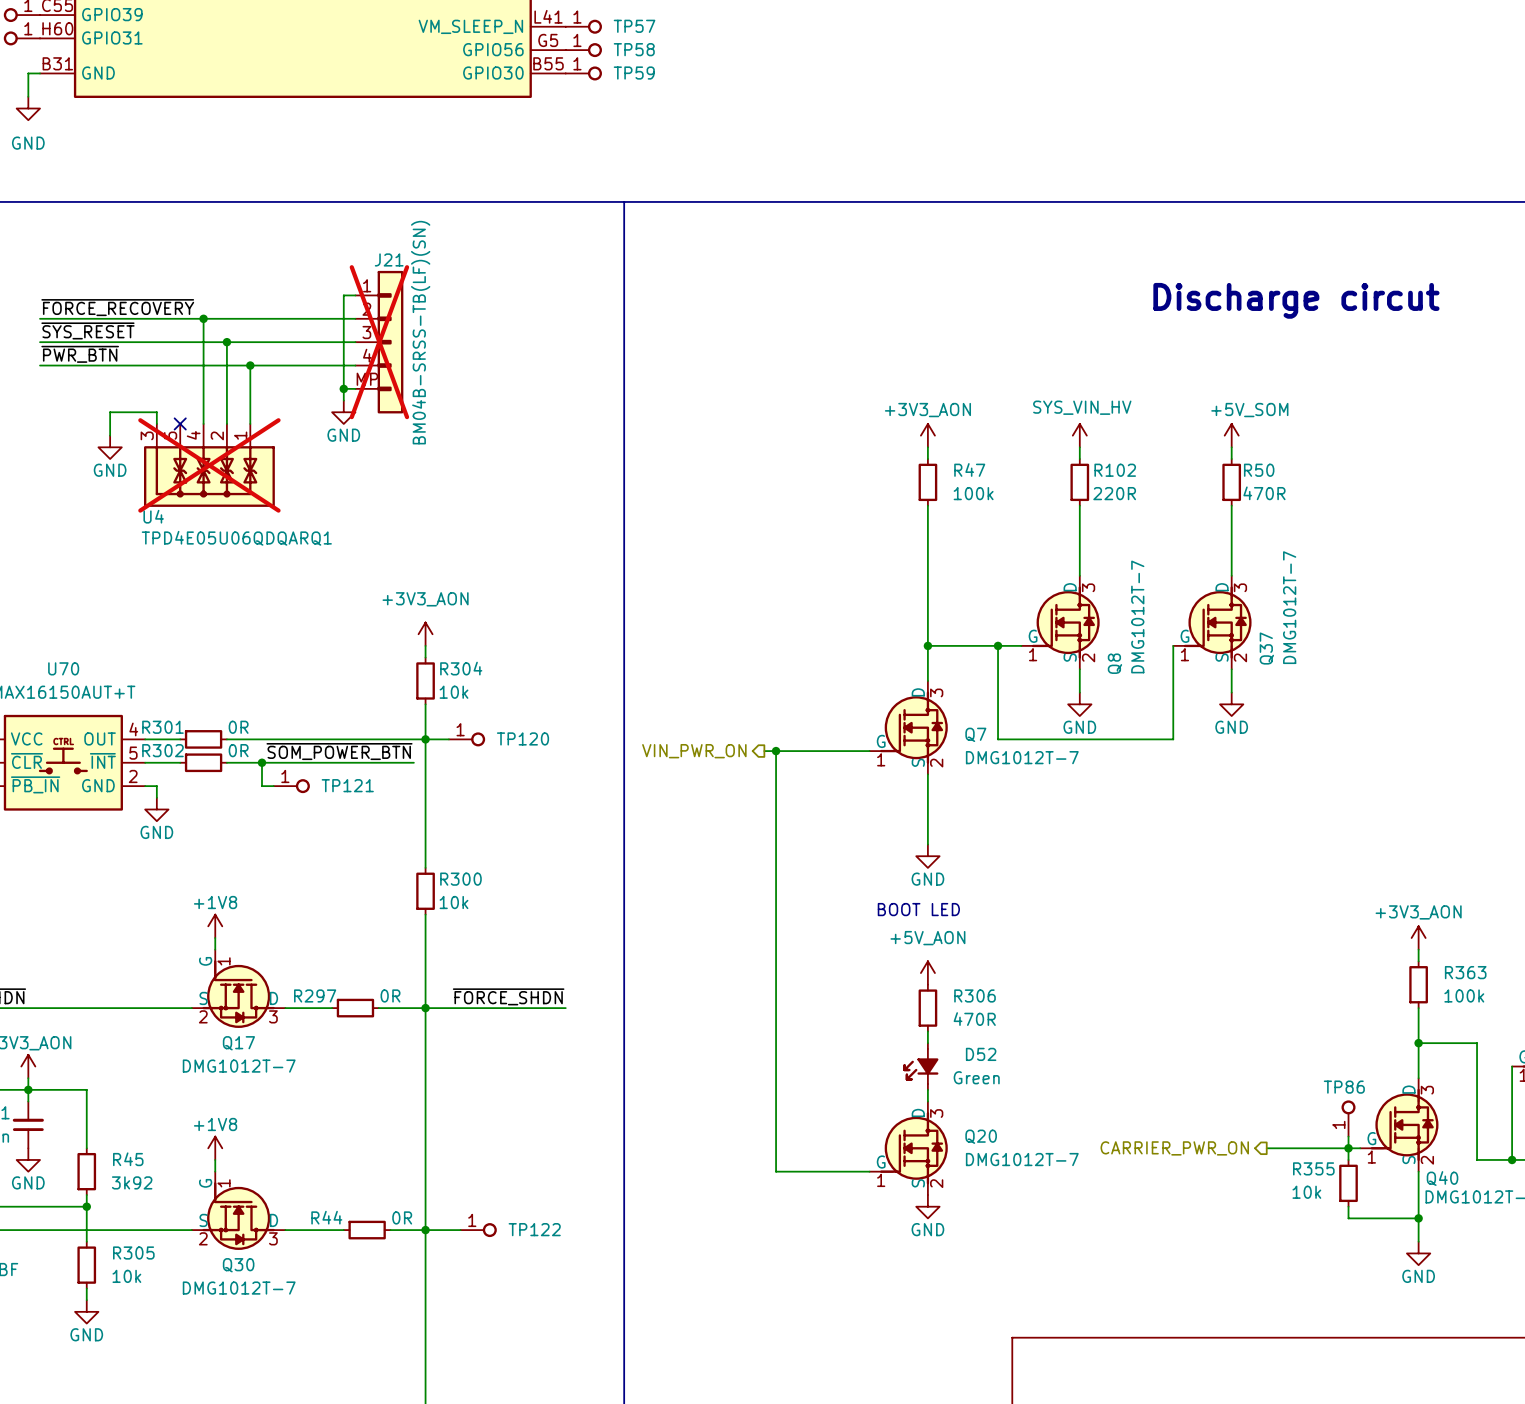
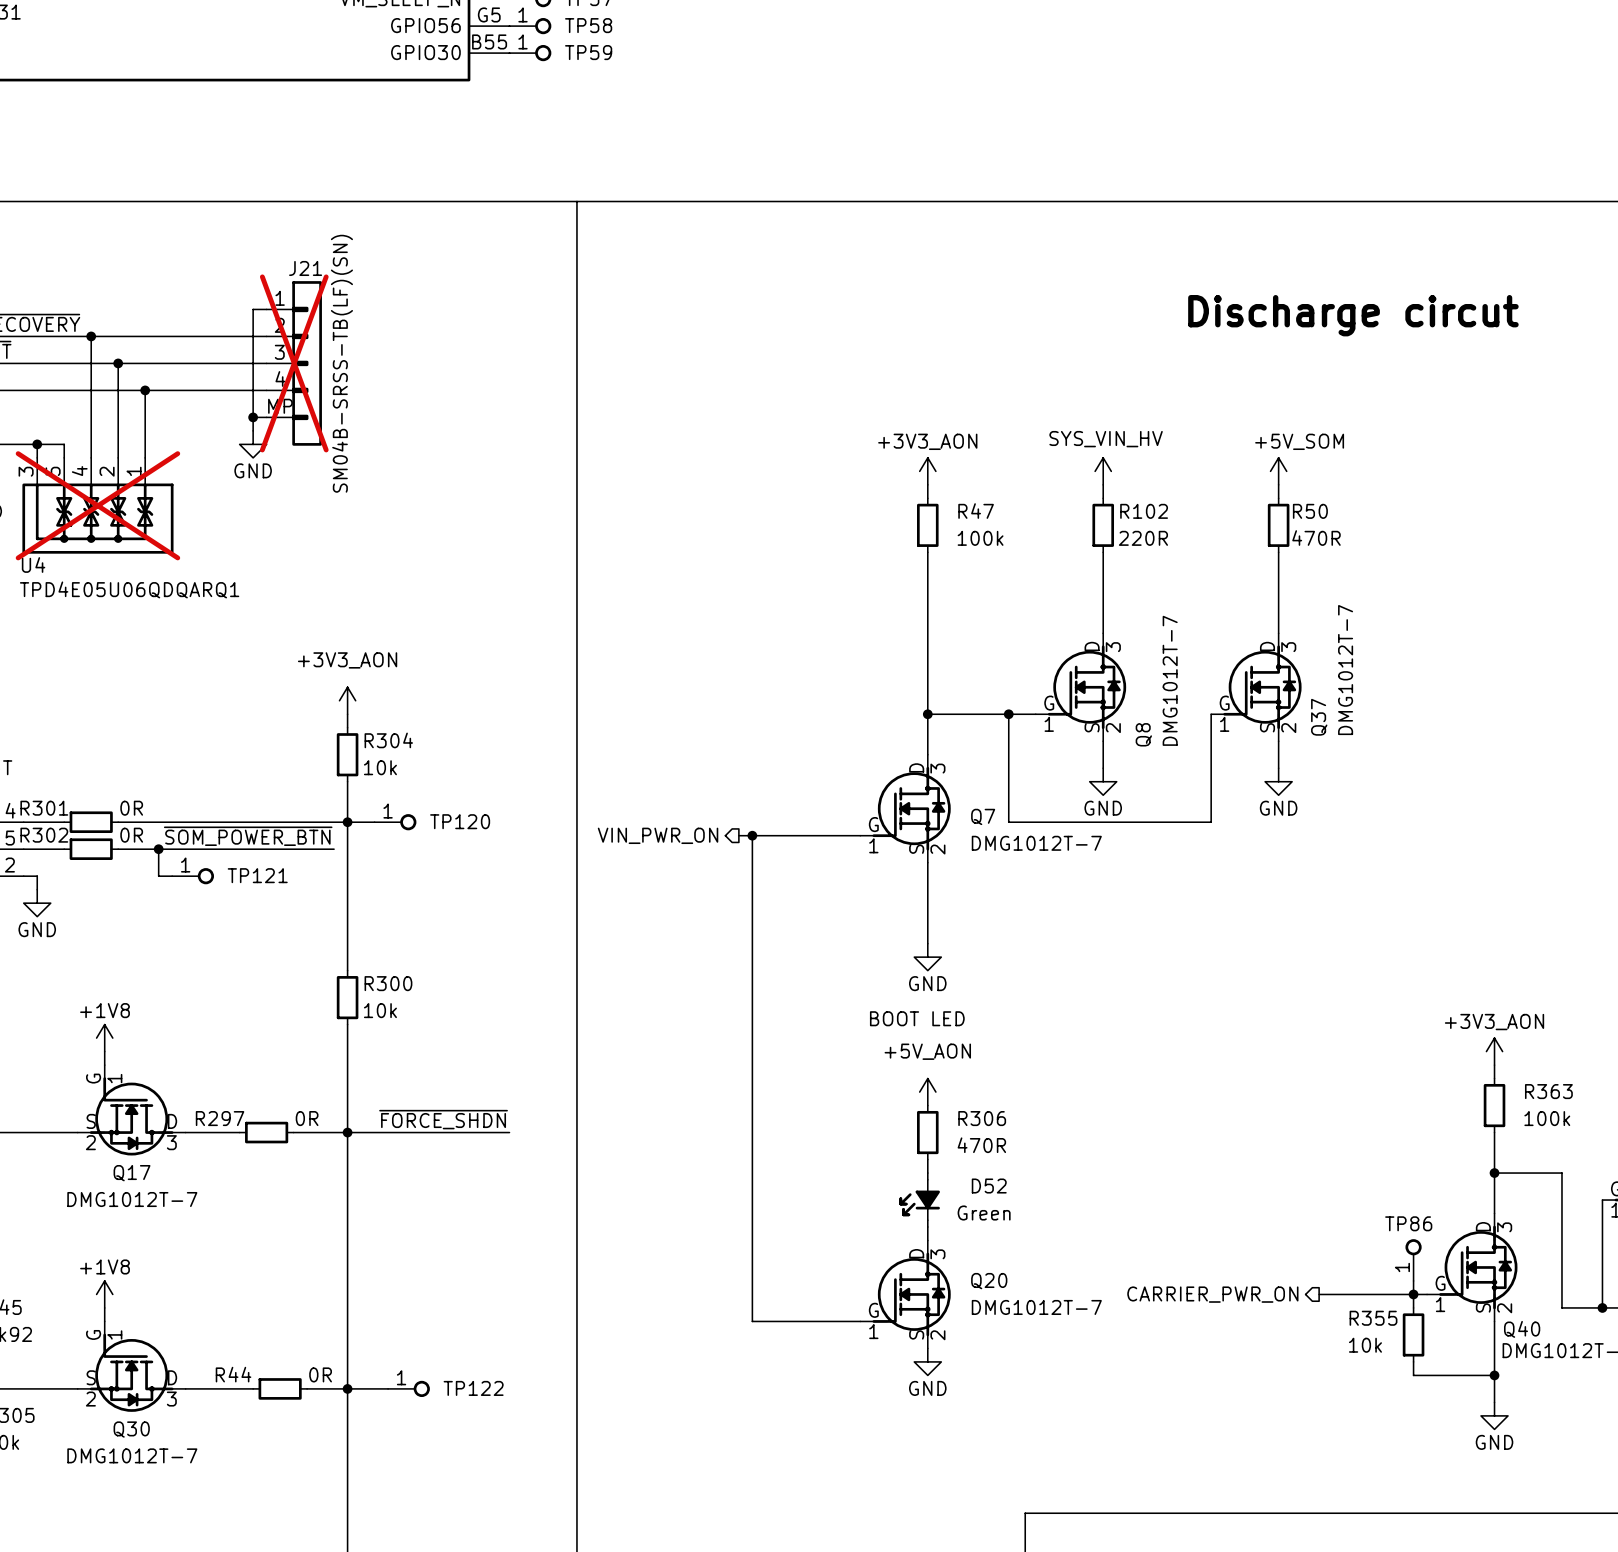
J21 text: BM04B-SRSS-TB(LF)(SN) (420, 332) -> SM04B-SRSS-TB(LF)(SN) (341, 363)
wire: none -> (37, 444) (64, 444) (64, 457)
junction: none -> (37, 444)
no-connect mark: (180, 423) -> none

